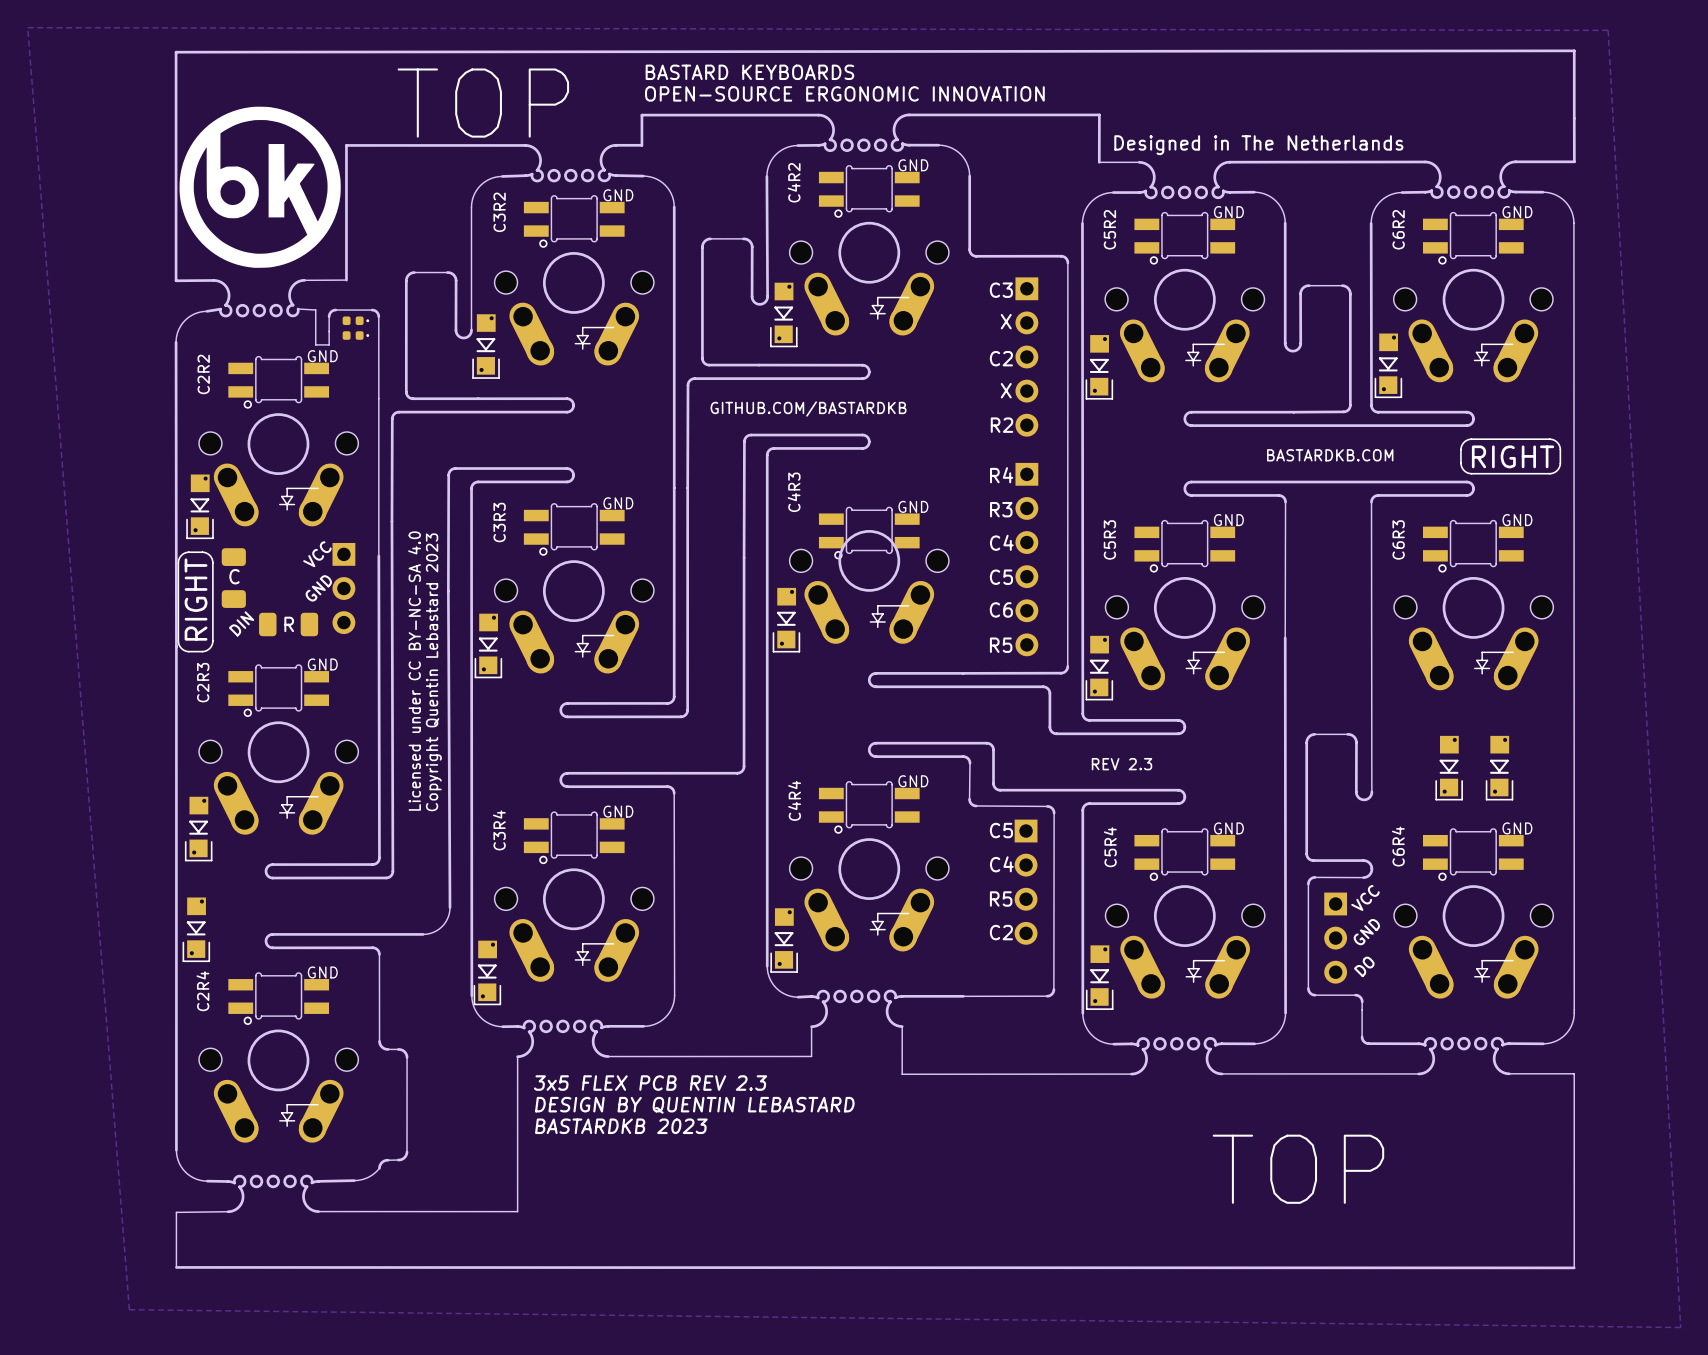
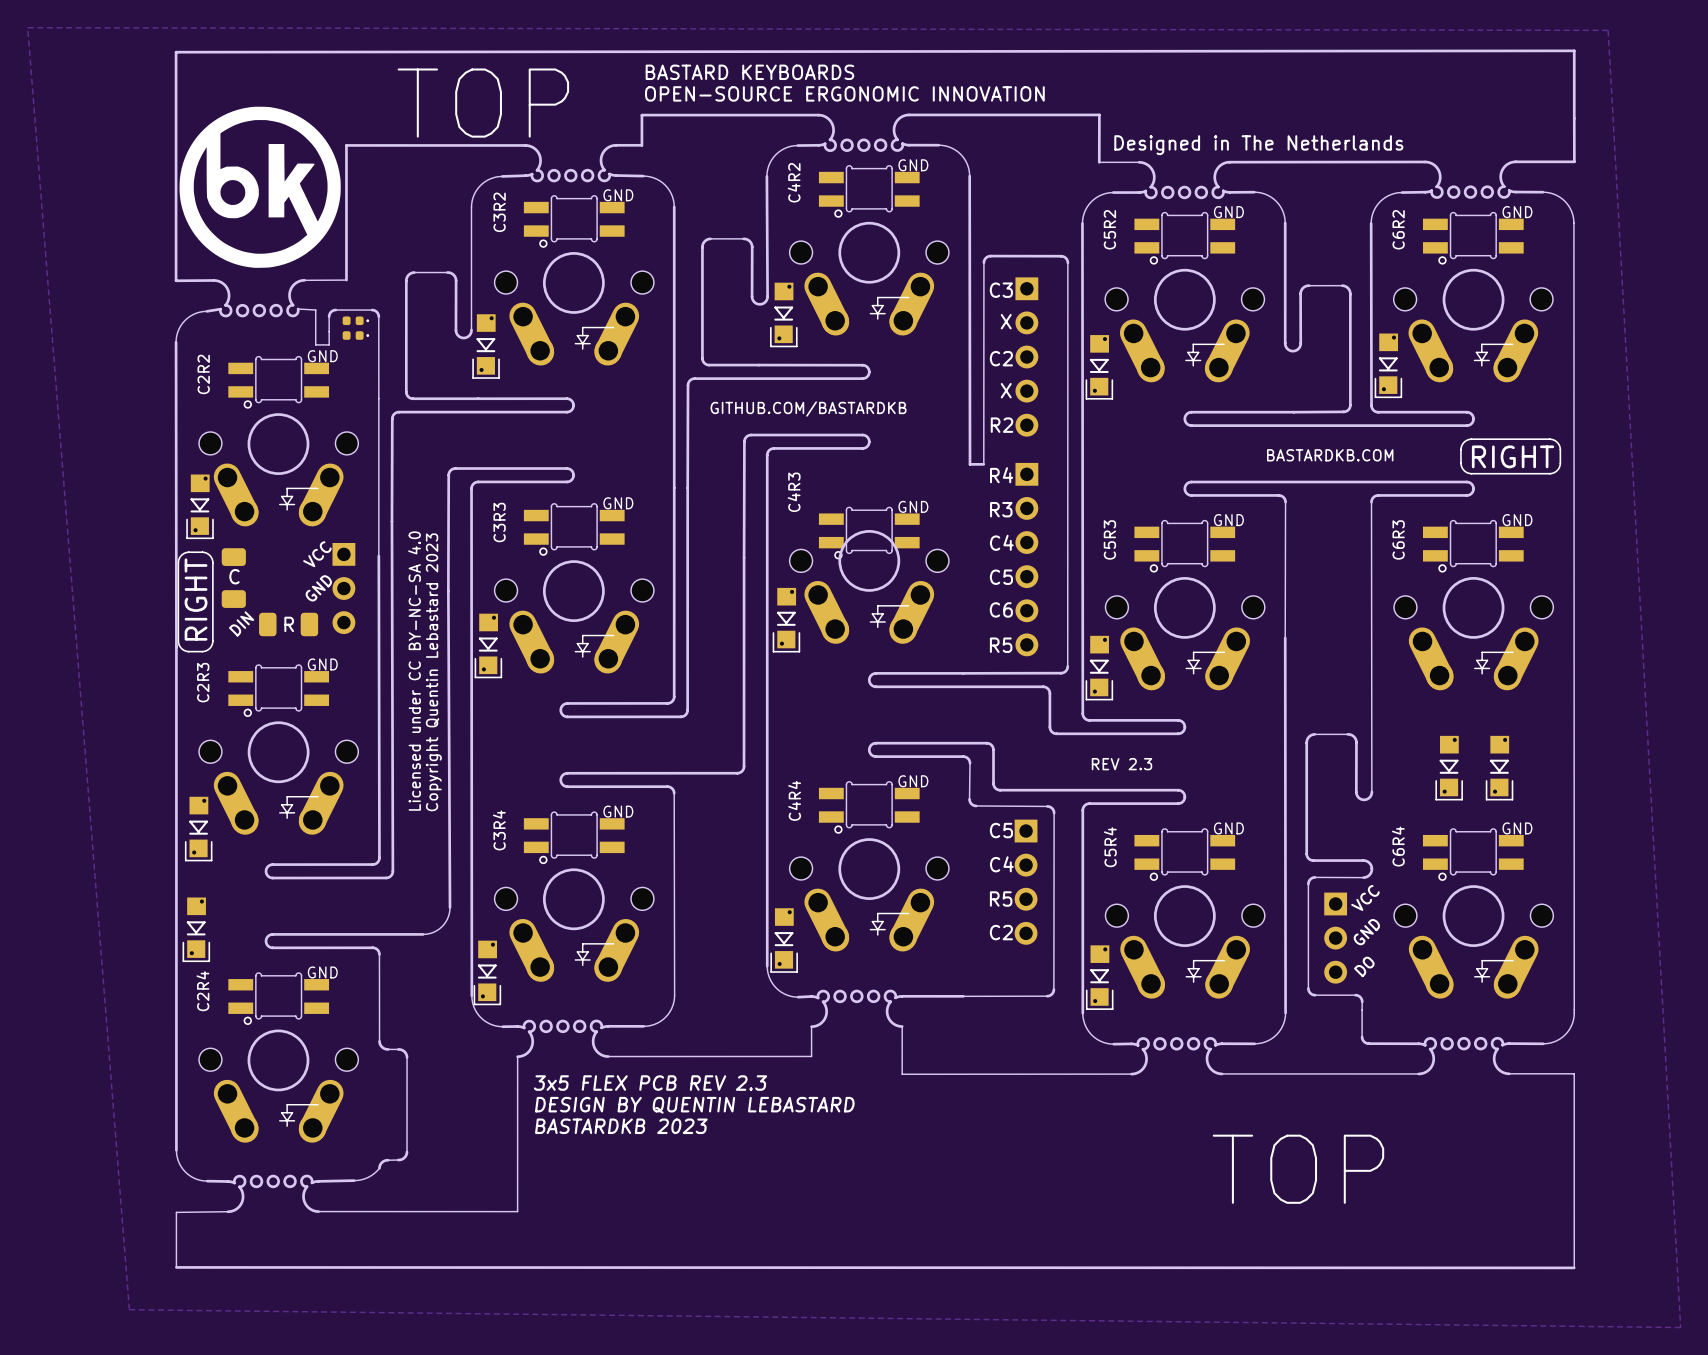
board edge: (969, 176) (969, 249) (972, 254) (1061, 256) -> (969, 176) (970, 464) (983, 464) (984, 260) (990, 256) (1061, 256)

